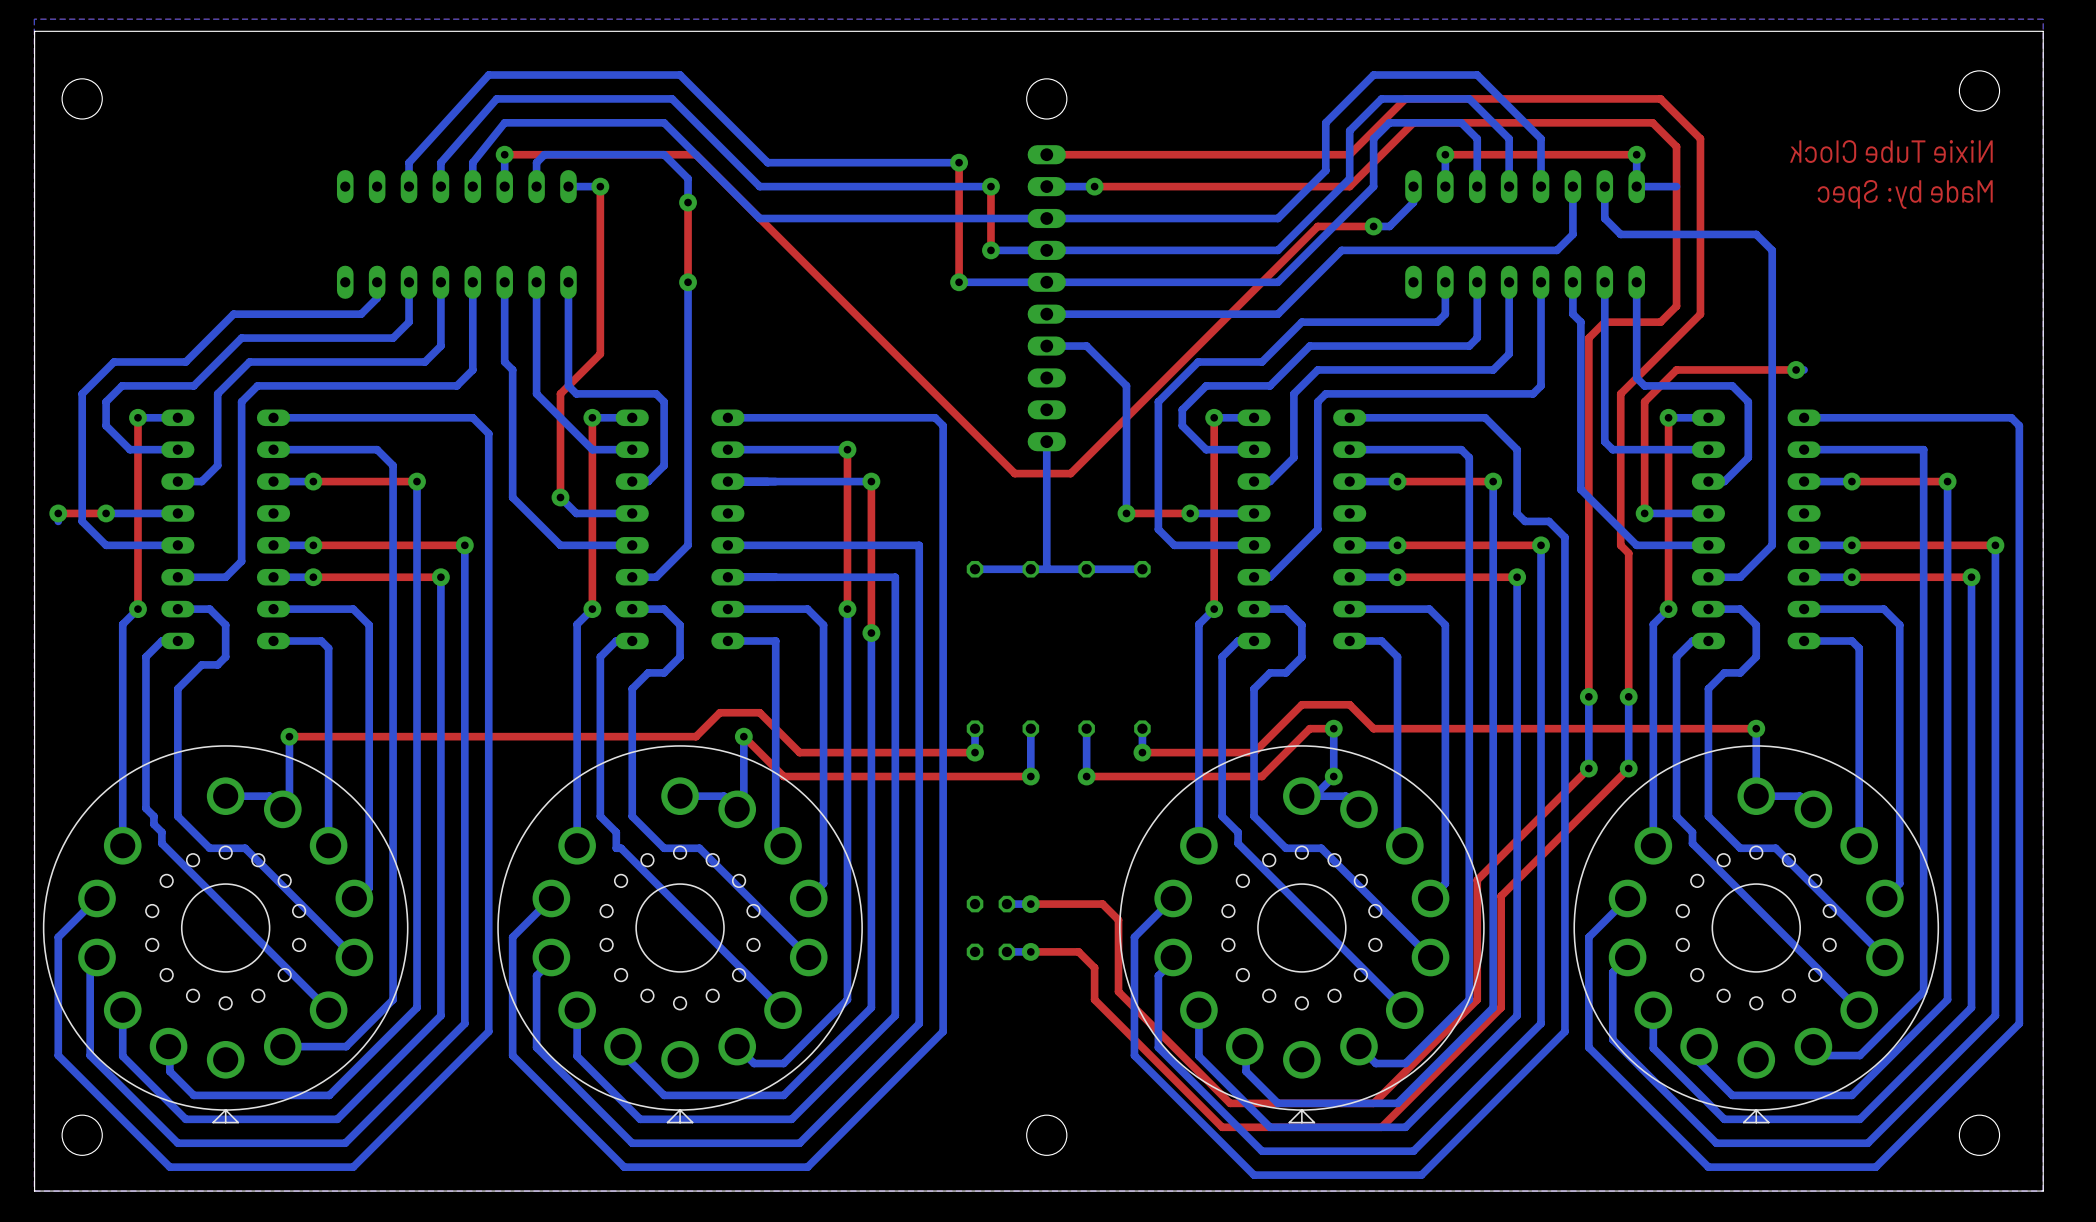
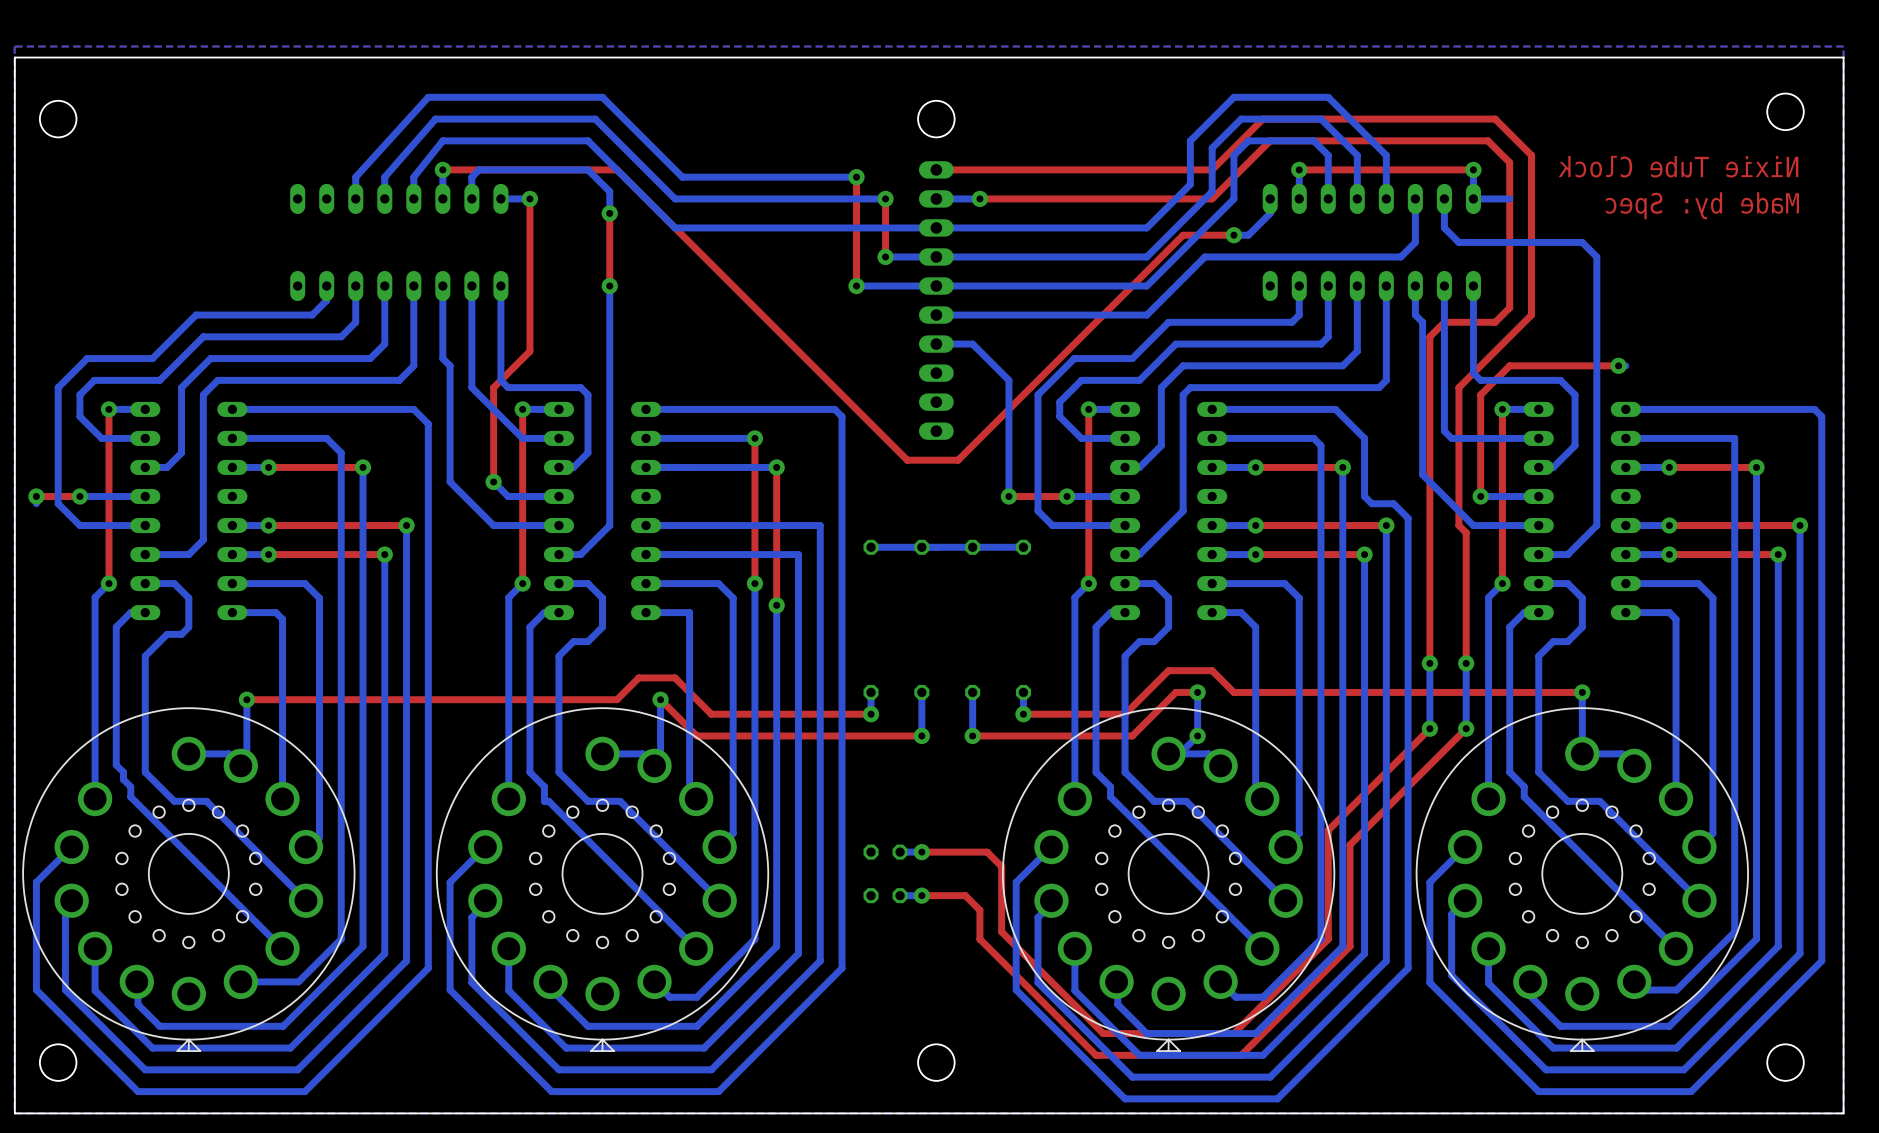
bottom track: (1046, 441) (1046, 569) -> none

